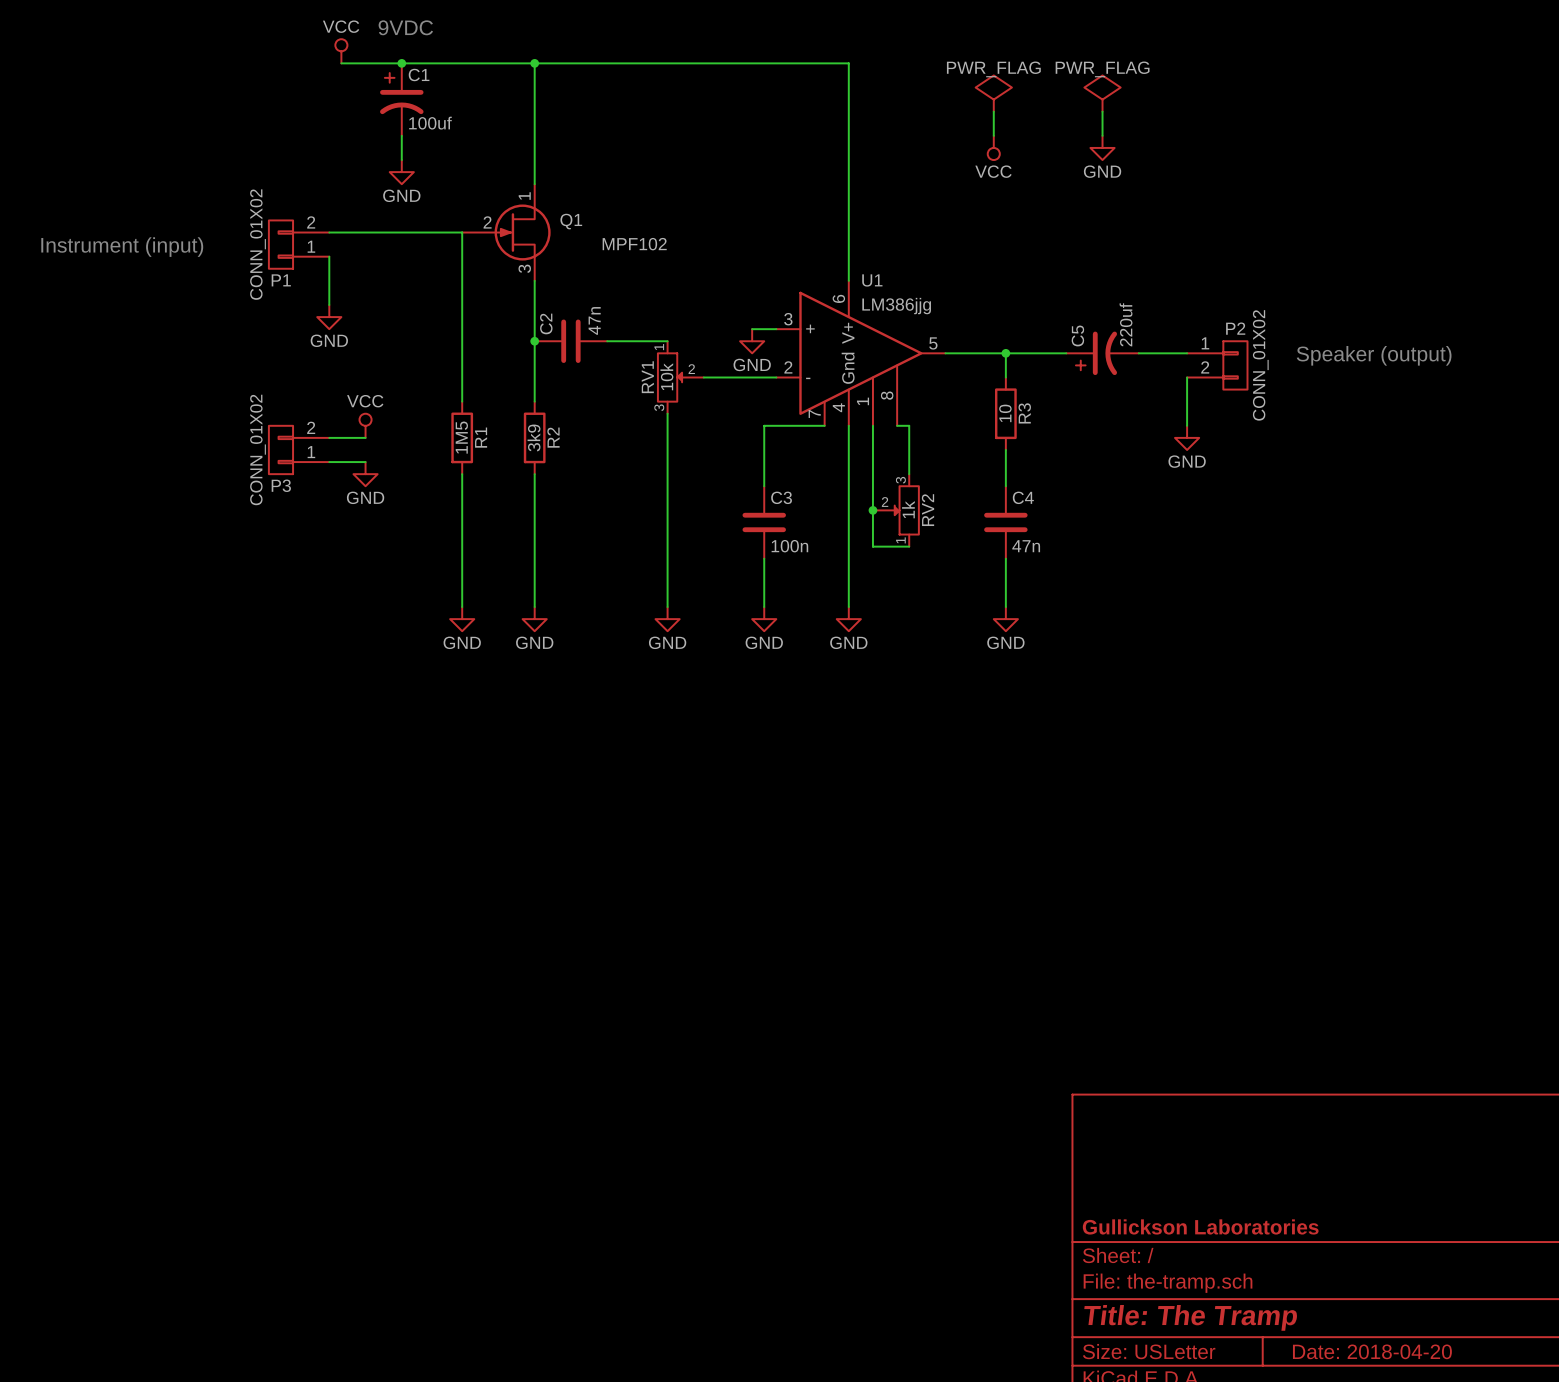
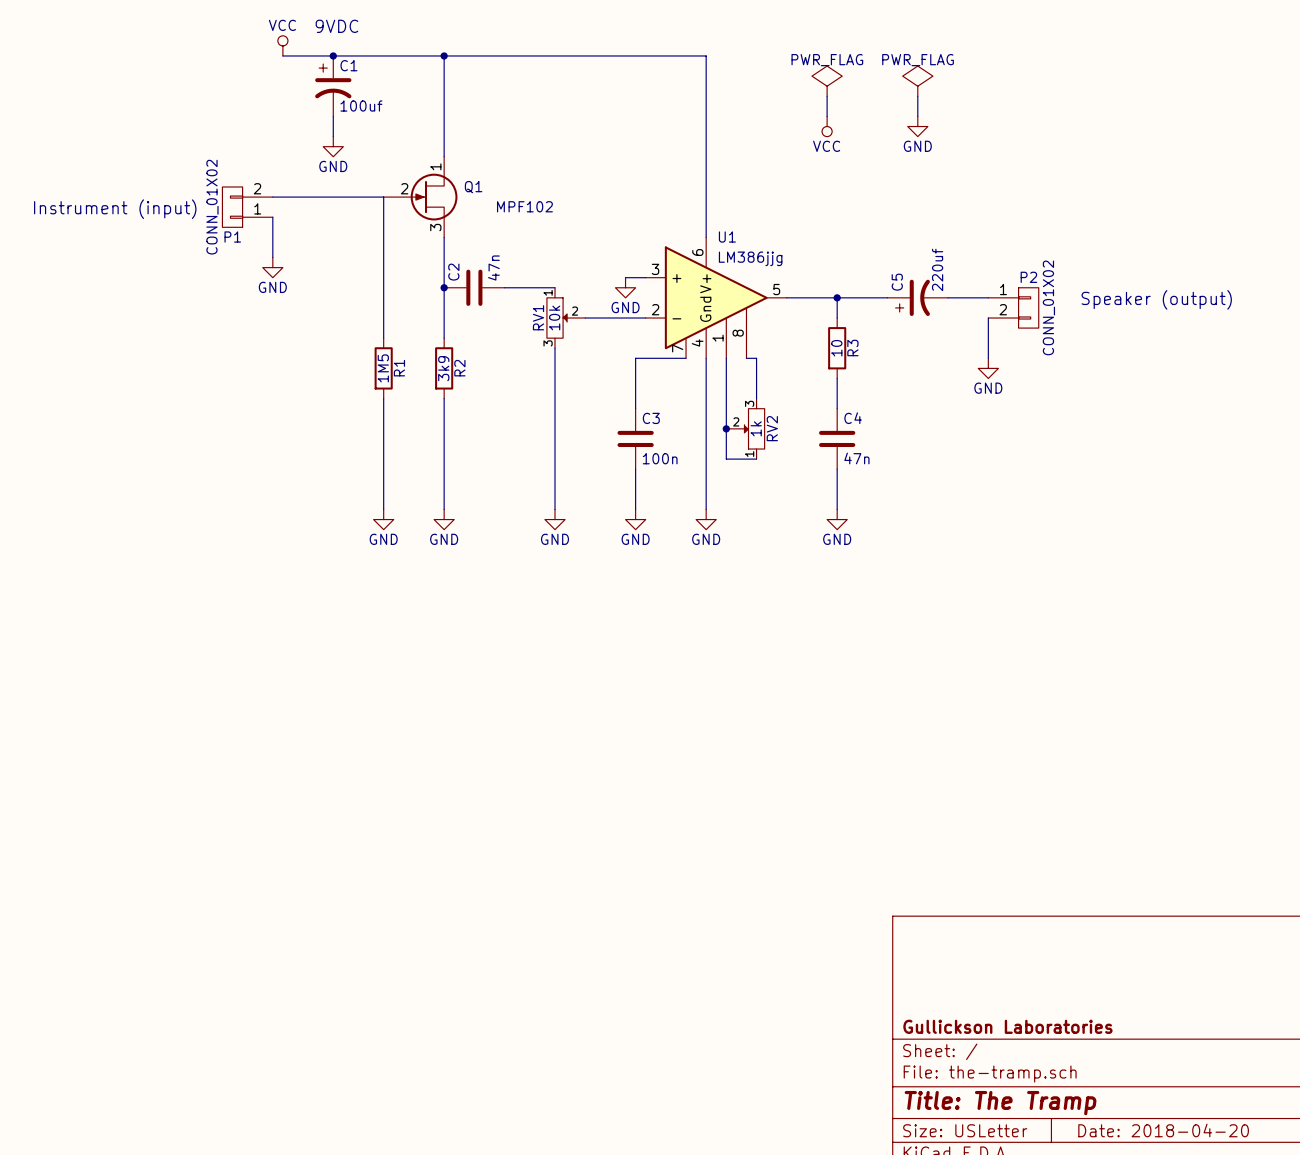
power symbol: VCC (365, 425) -> none
wire: (329, 437) (365, 437) -> none
P3: CONN_01X02 (299, 449) -> none
wire: (329, 462) (365, 462) -> none
power symbol: GND (365, 474) -> none

